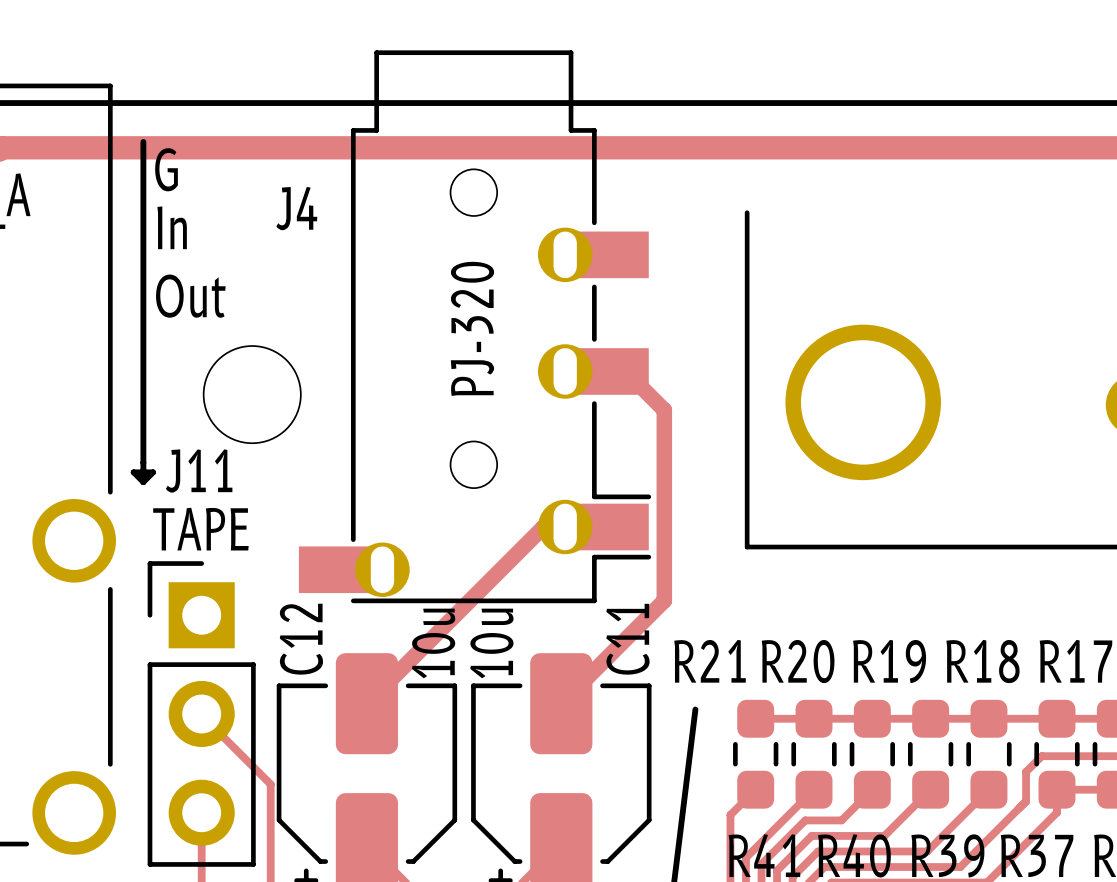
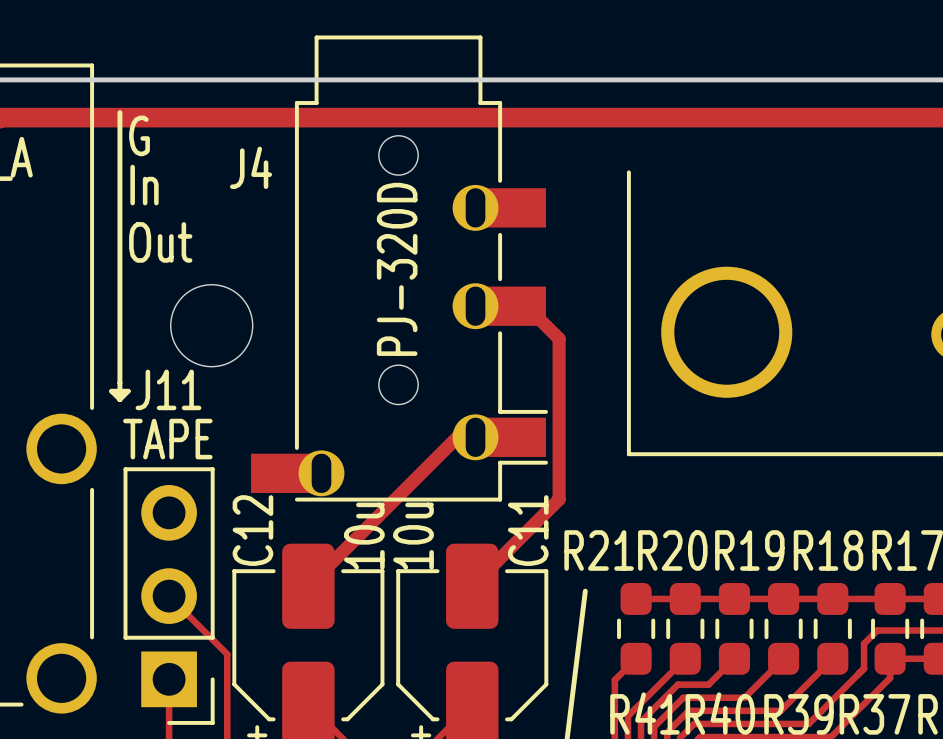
J4 value: PJ-320 (472, 328) -> PJ-320D (397, 269)
J11 footprint: [147, 561, 256, 867] -> [123, 467, 215, 725]

